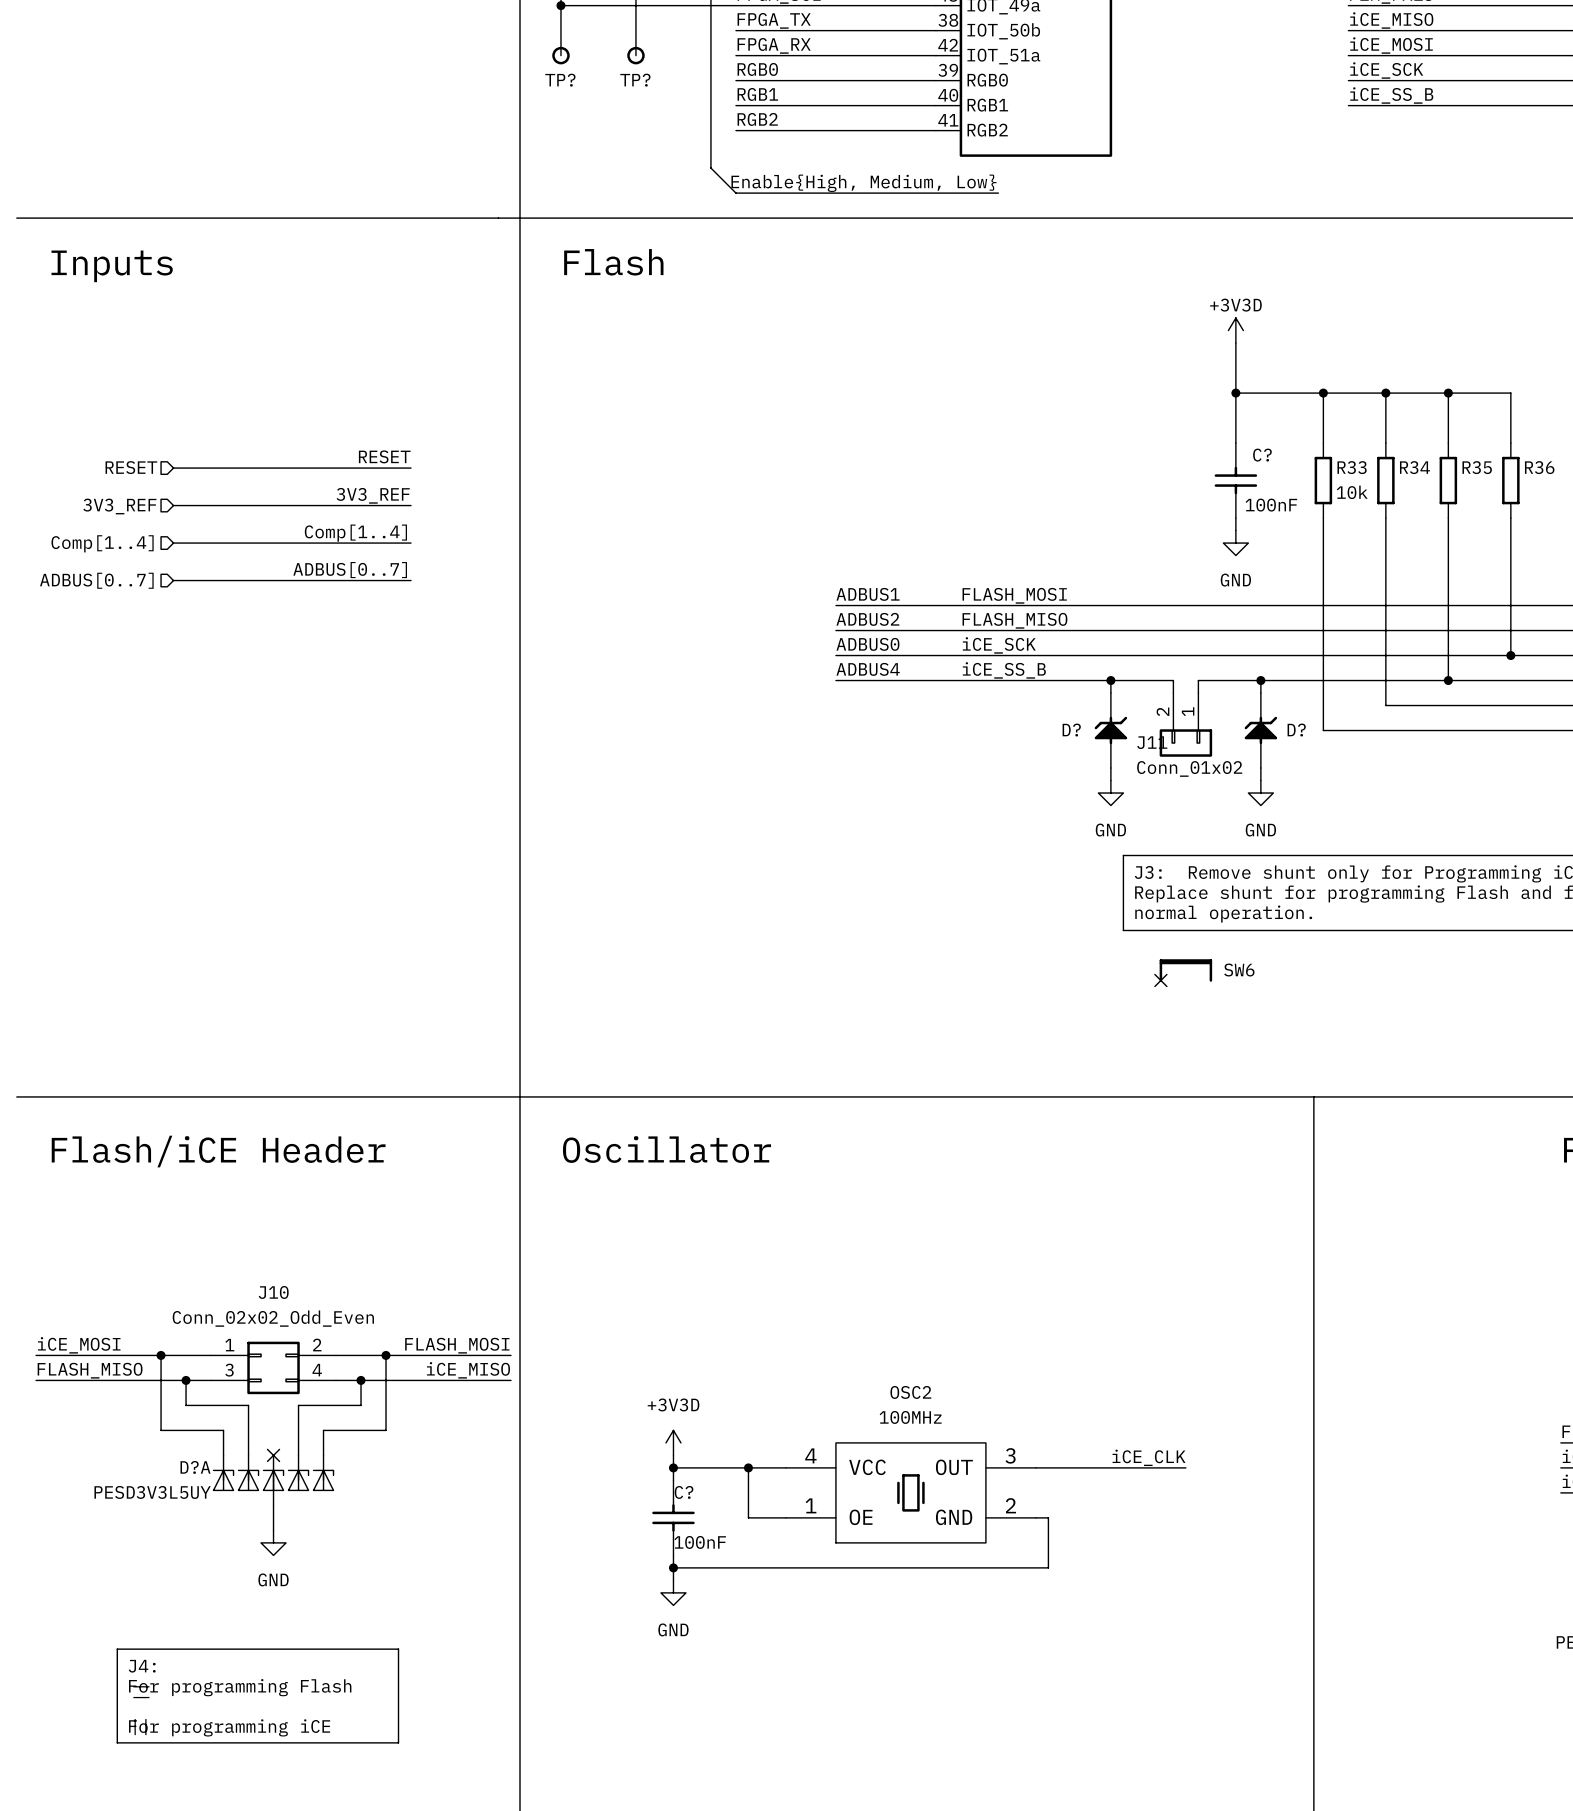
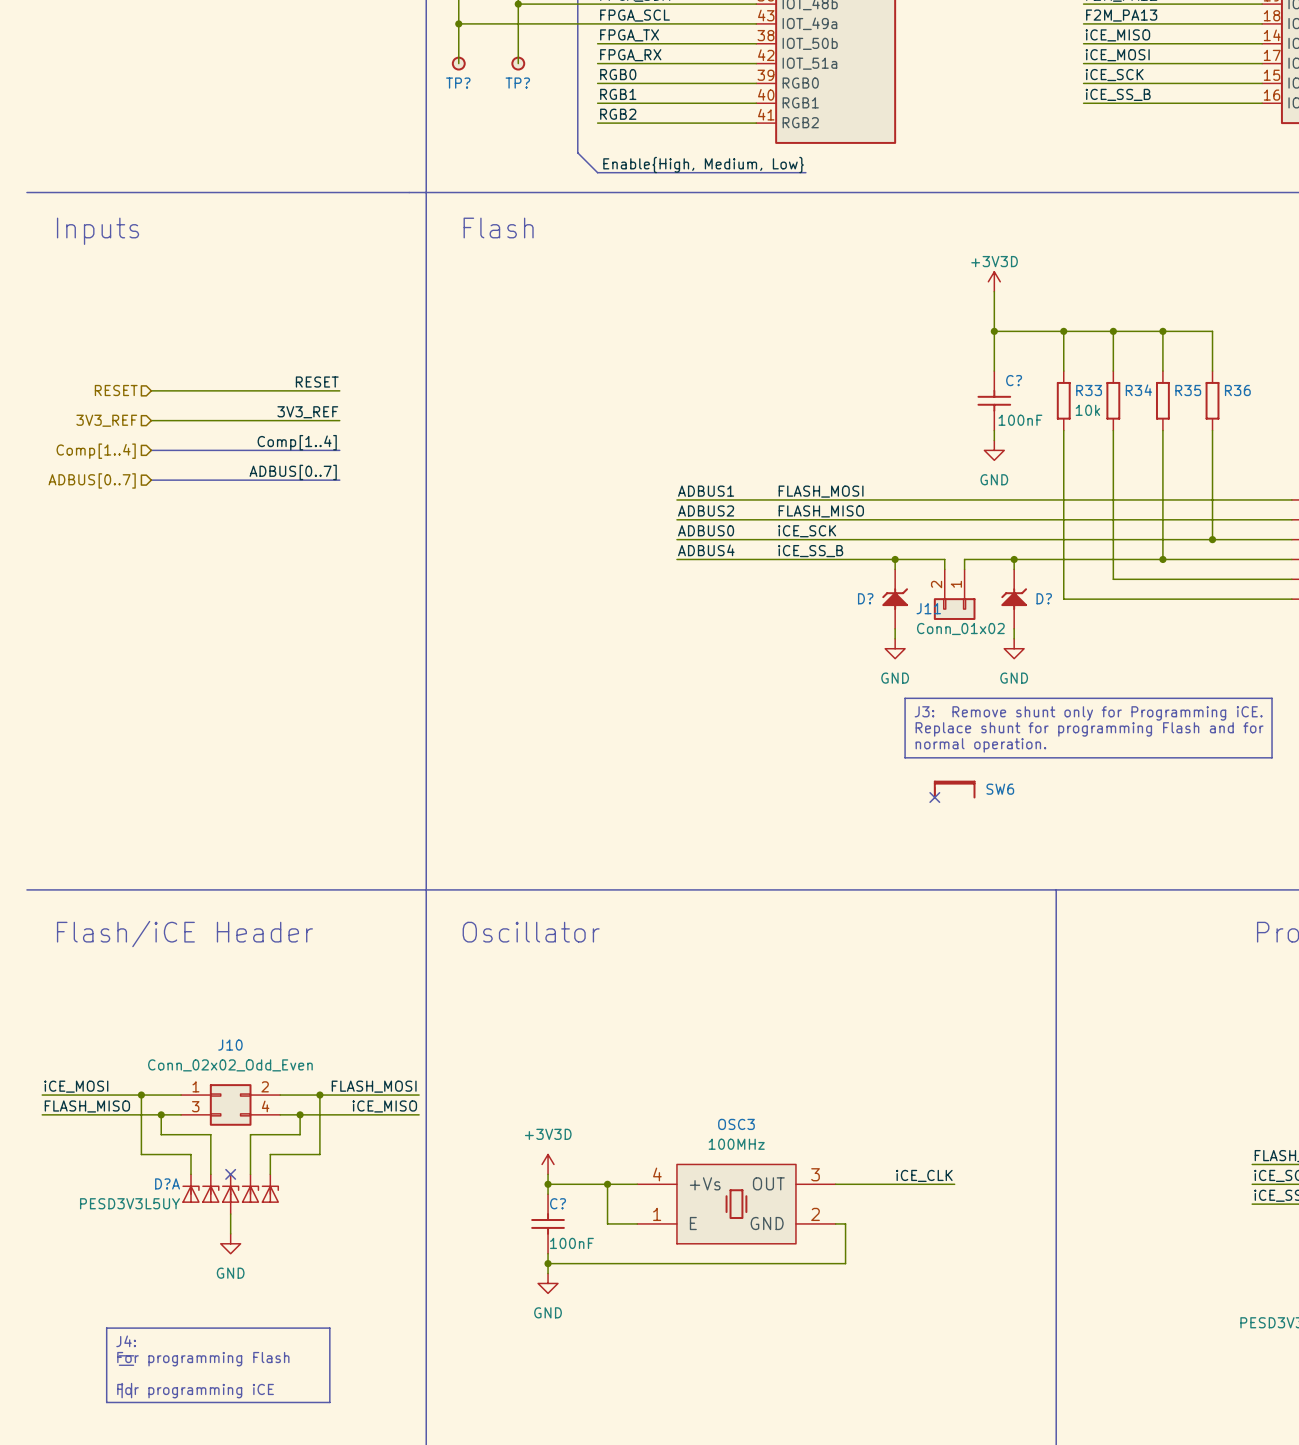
OSC2 name: OSC2 (910, 1392) -> OSC3 (736, 1124)
OSC2 pin name: VCC (867, 1467) -> +Vs (705, 1183)
OSC2 pin name: OE (861, 1517) -> E (693, 1223)

